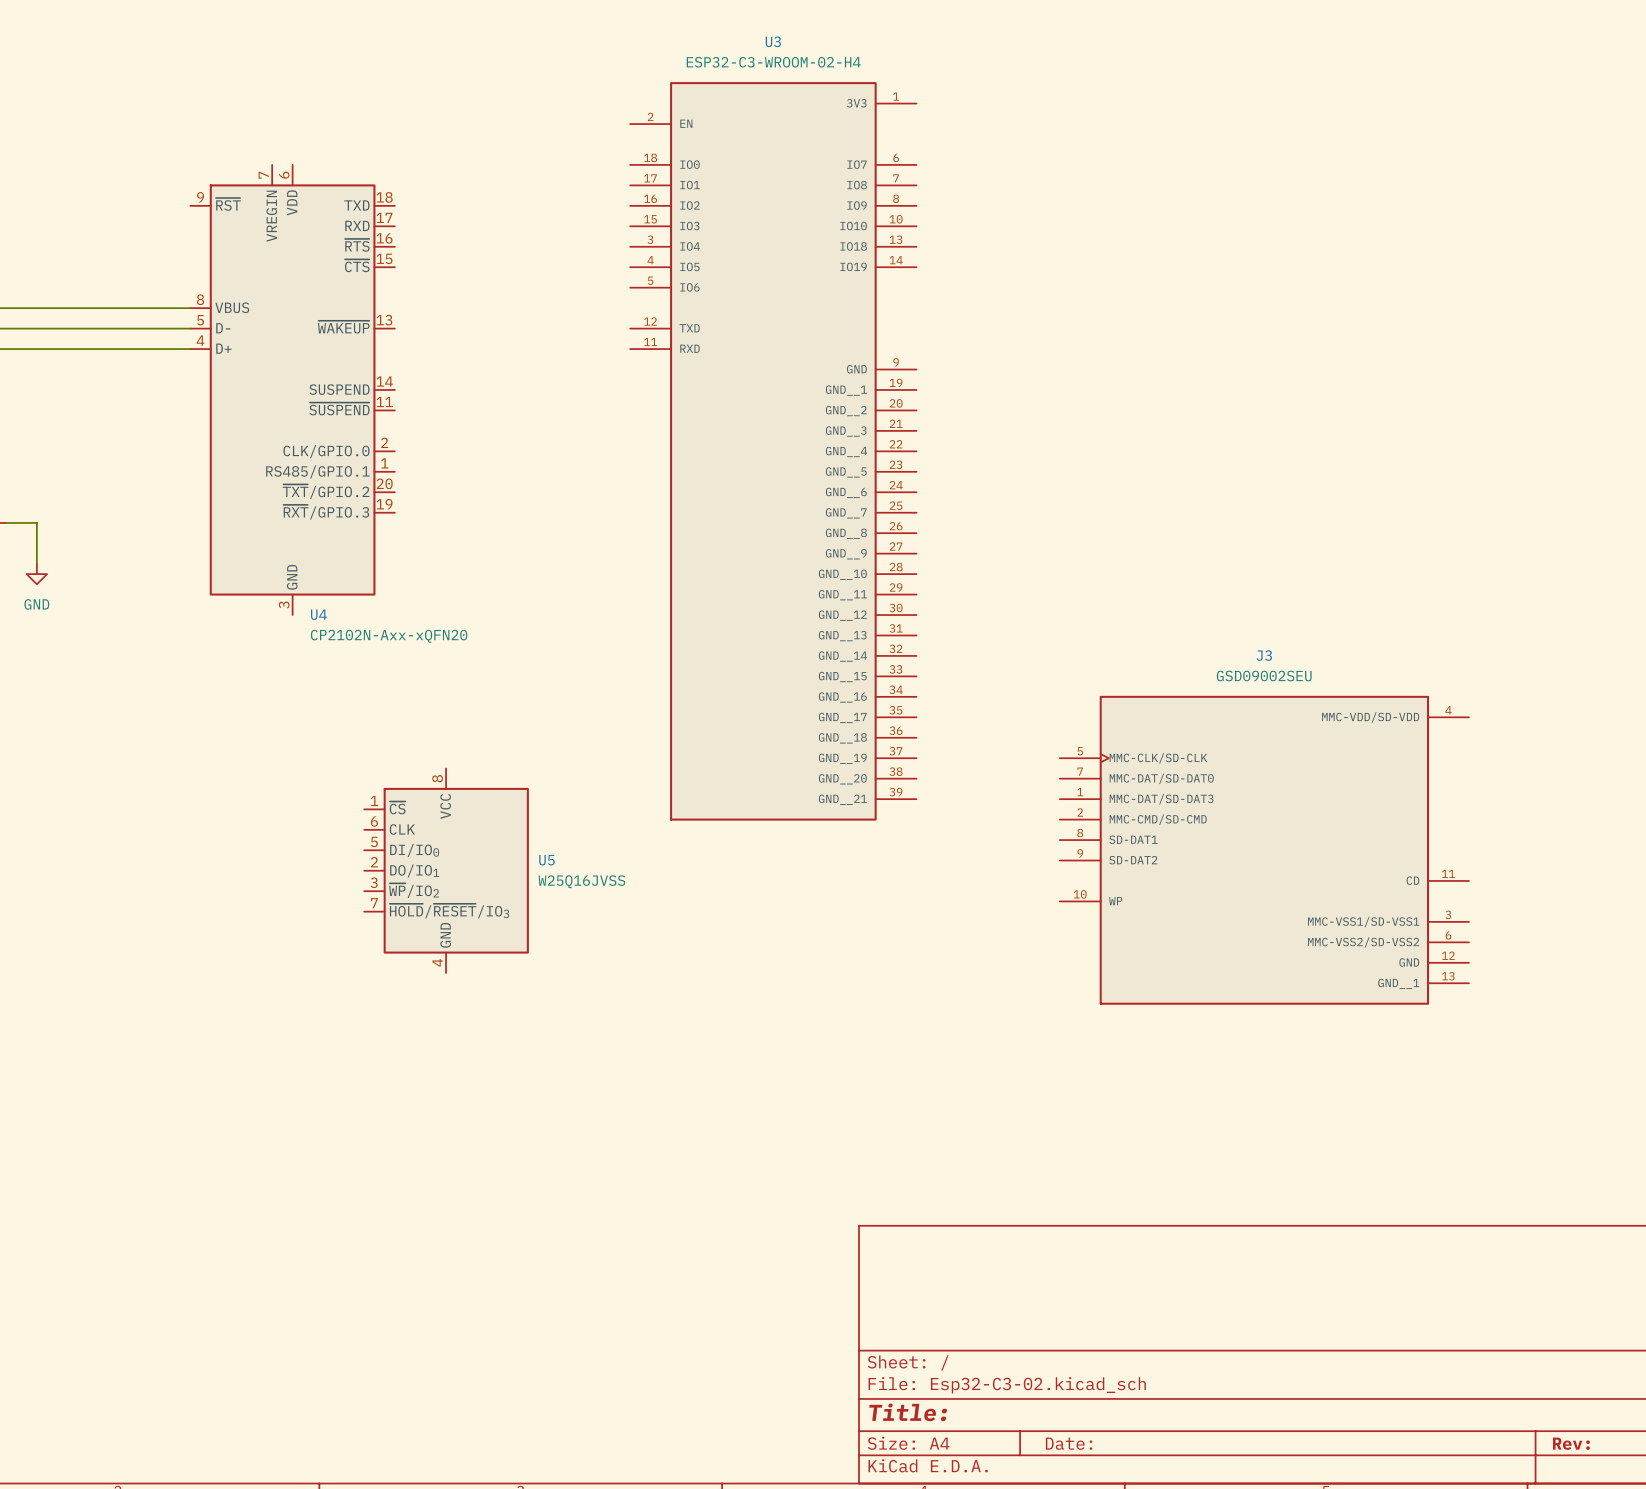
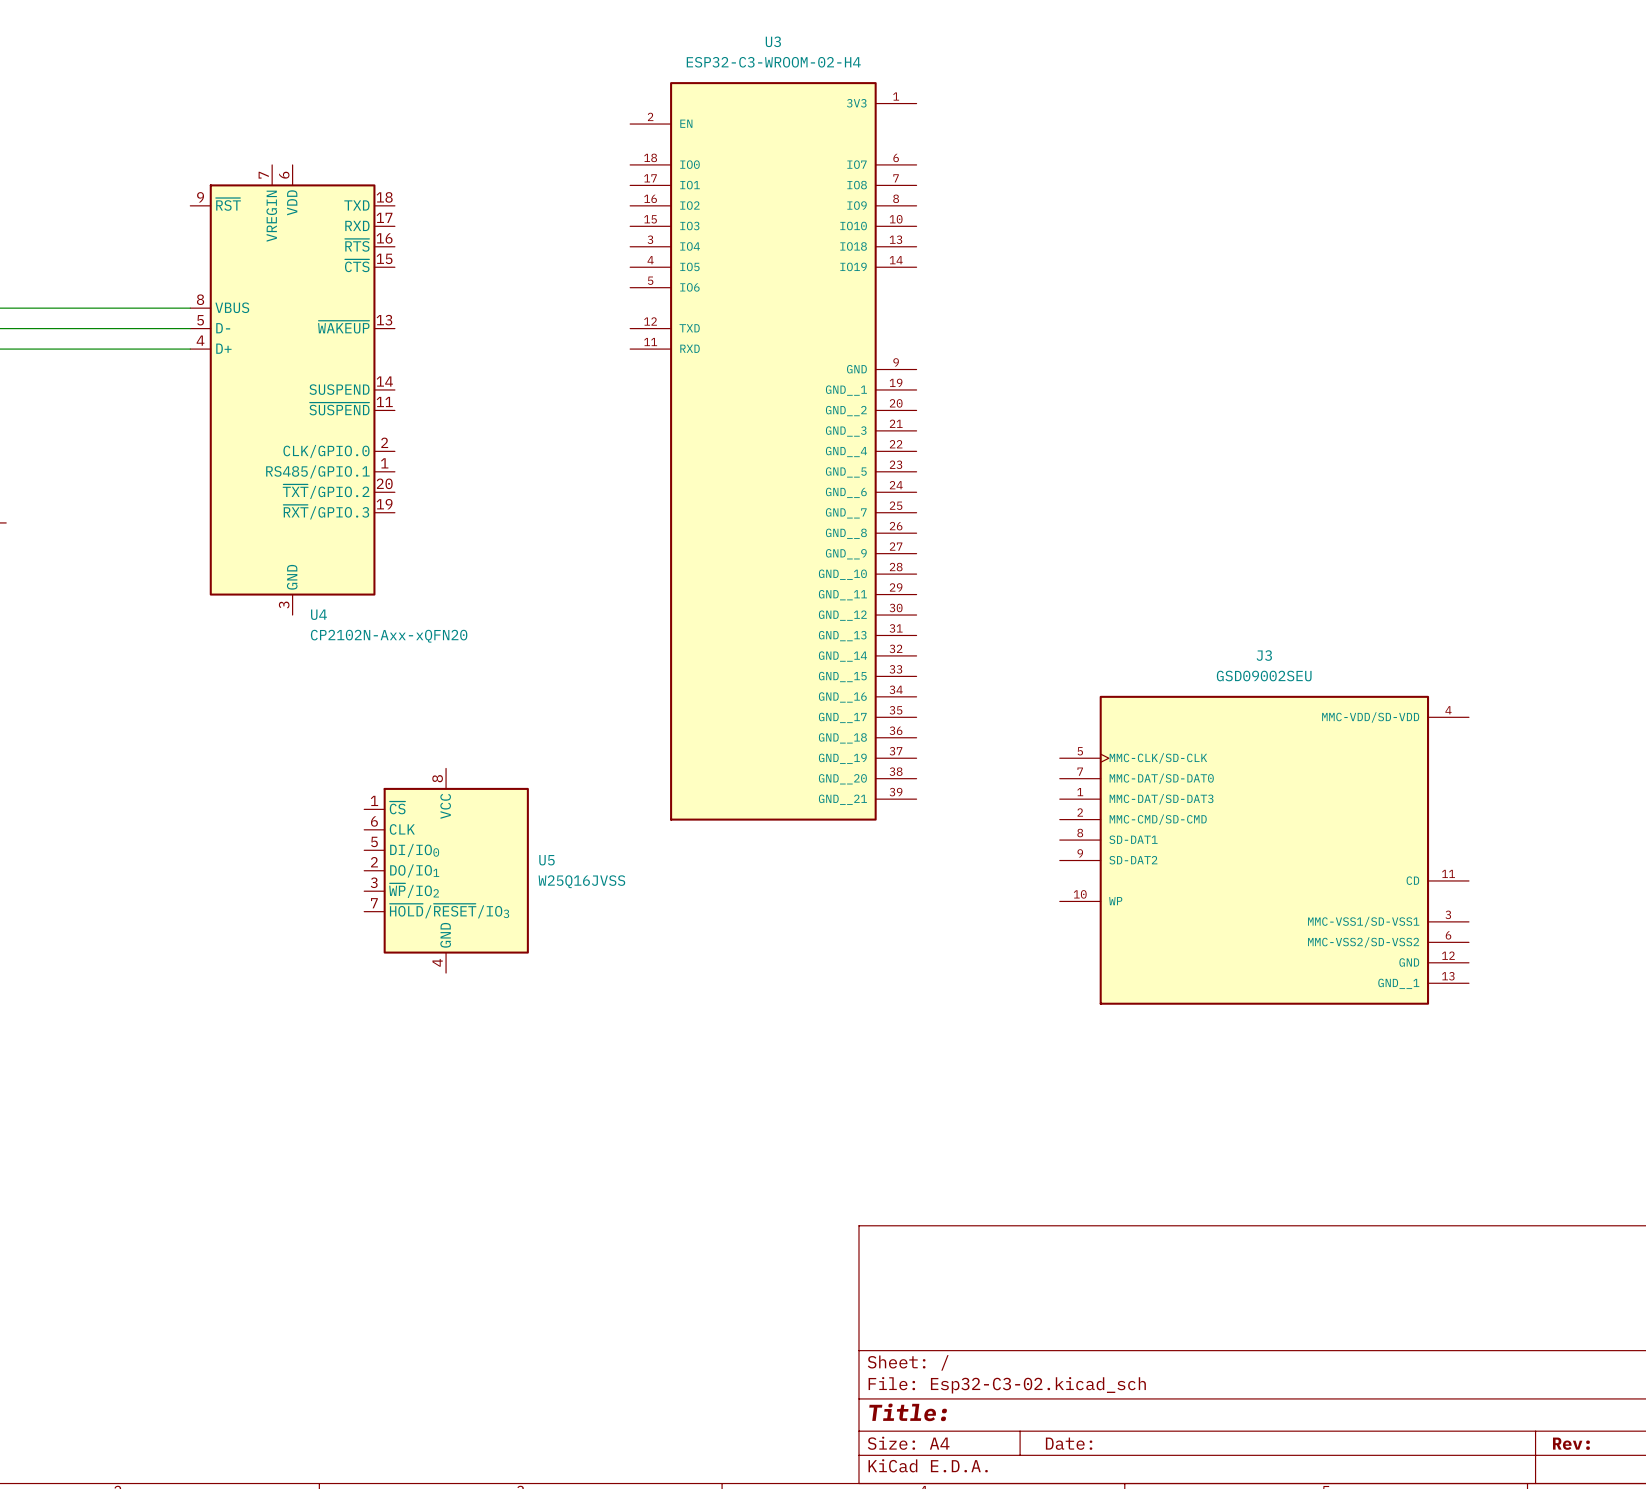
wire: (6, 522) (36, 522) (36, 563) -> none
power symbol: GND (36, 574) -> none

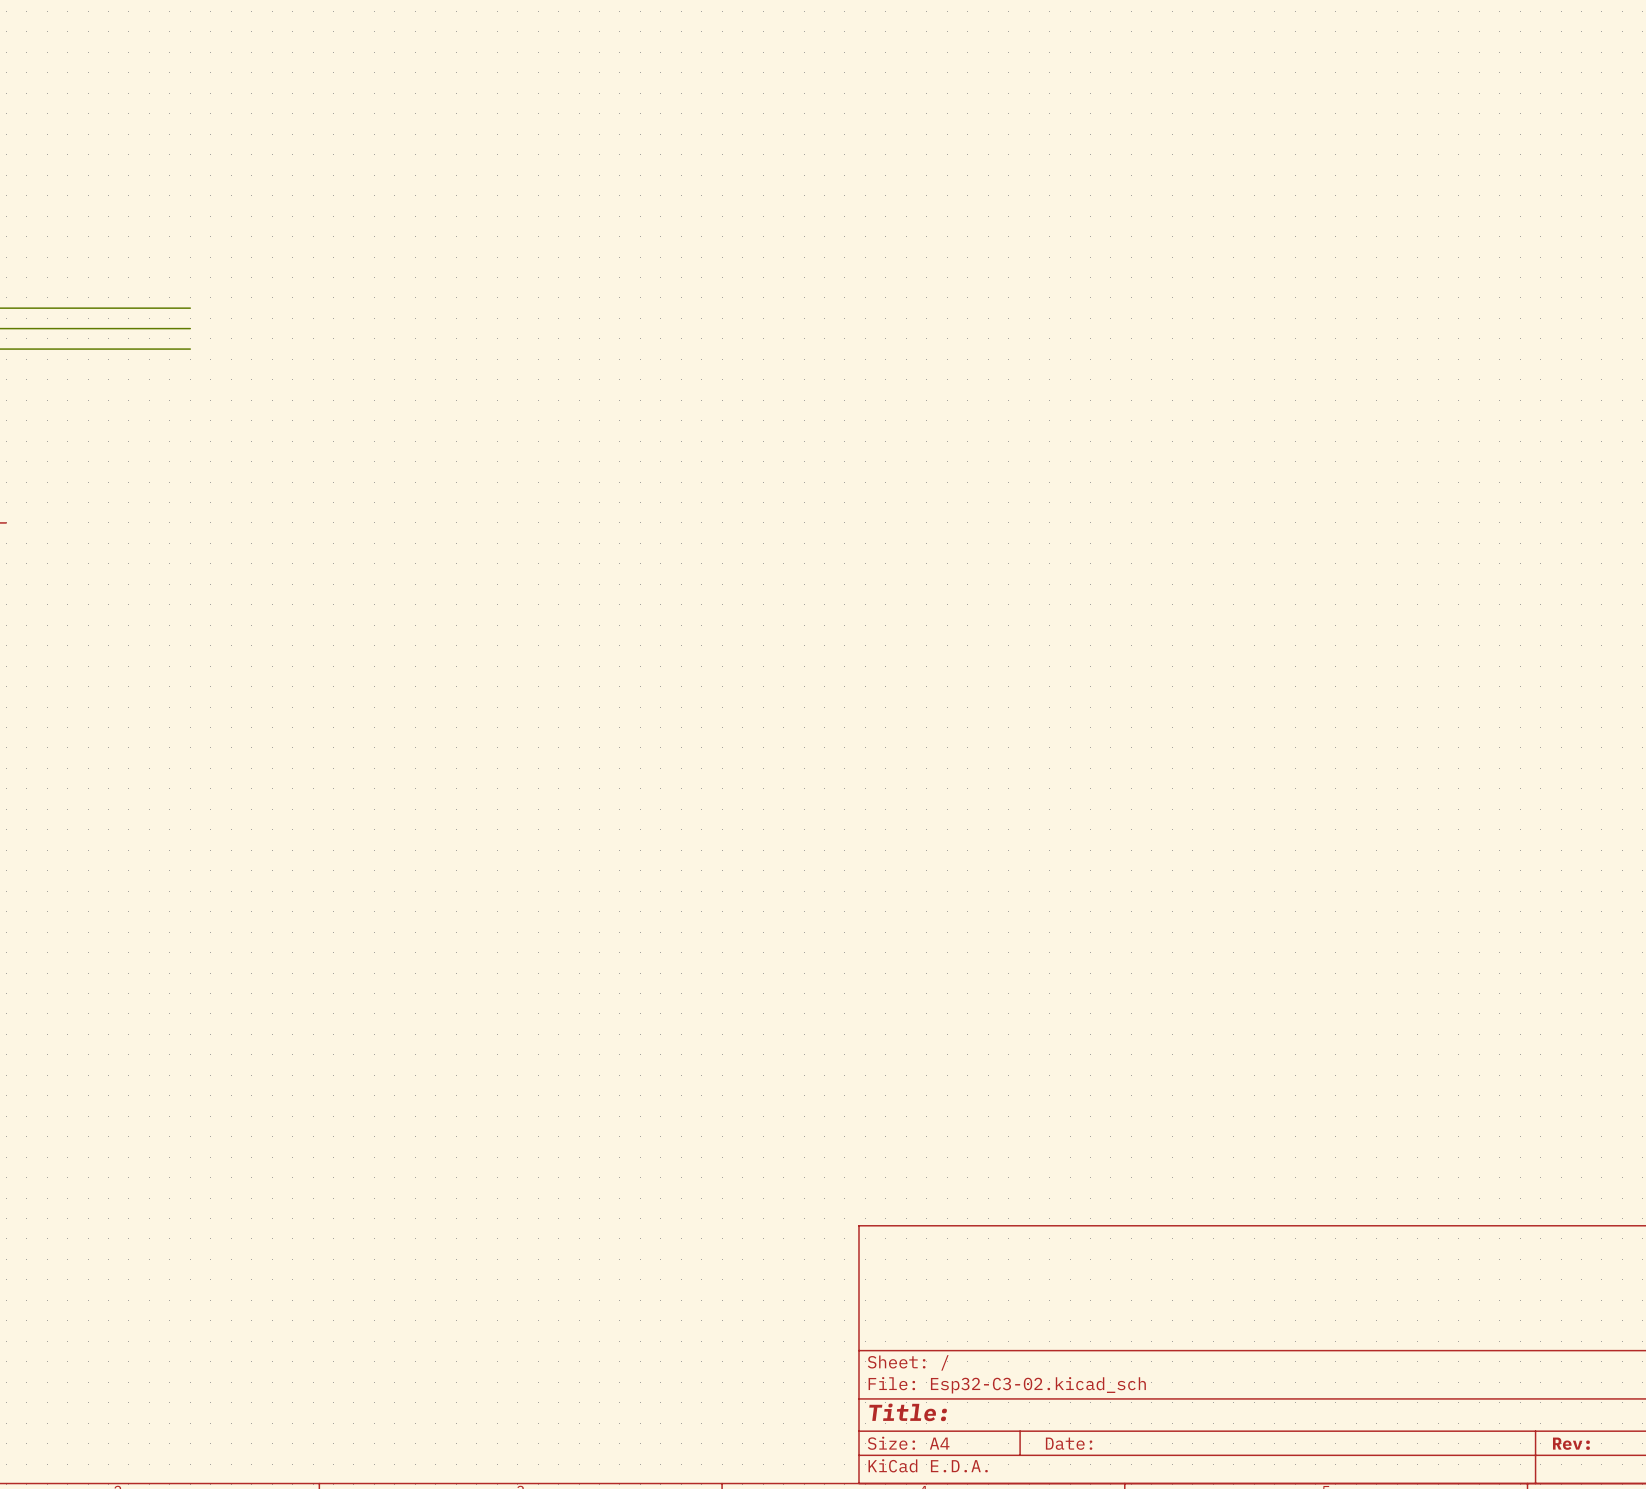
U4: CP2102N-Axx-xQFN20 (292, 389) -> none
U3: ESP32-C3-WROOM-02-H4 (773, 451) -> none
J3: GSD09002SEU (1264, 850) -> none
U5: W25Q16JVSS (446, 870) -> none

